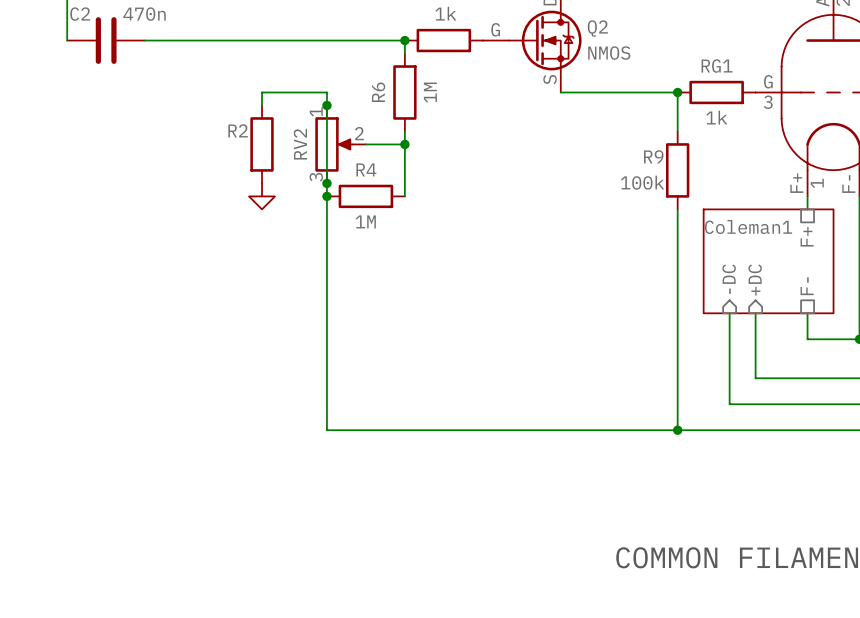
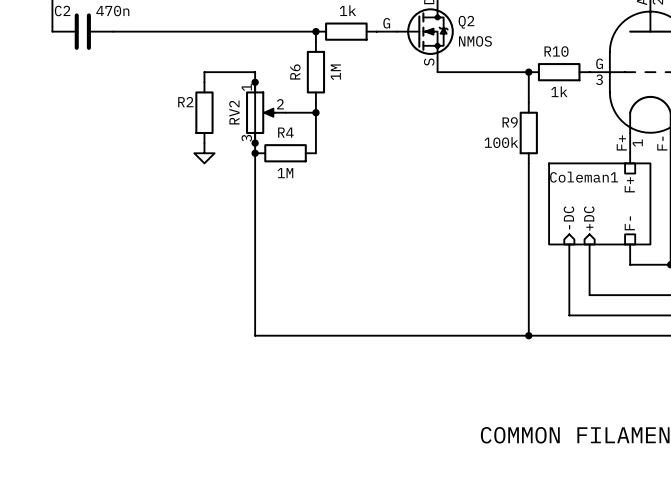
RG1 name: RG1 (717, 66) -> R10 (556, 51)

